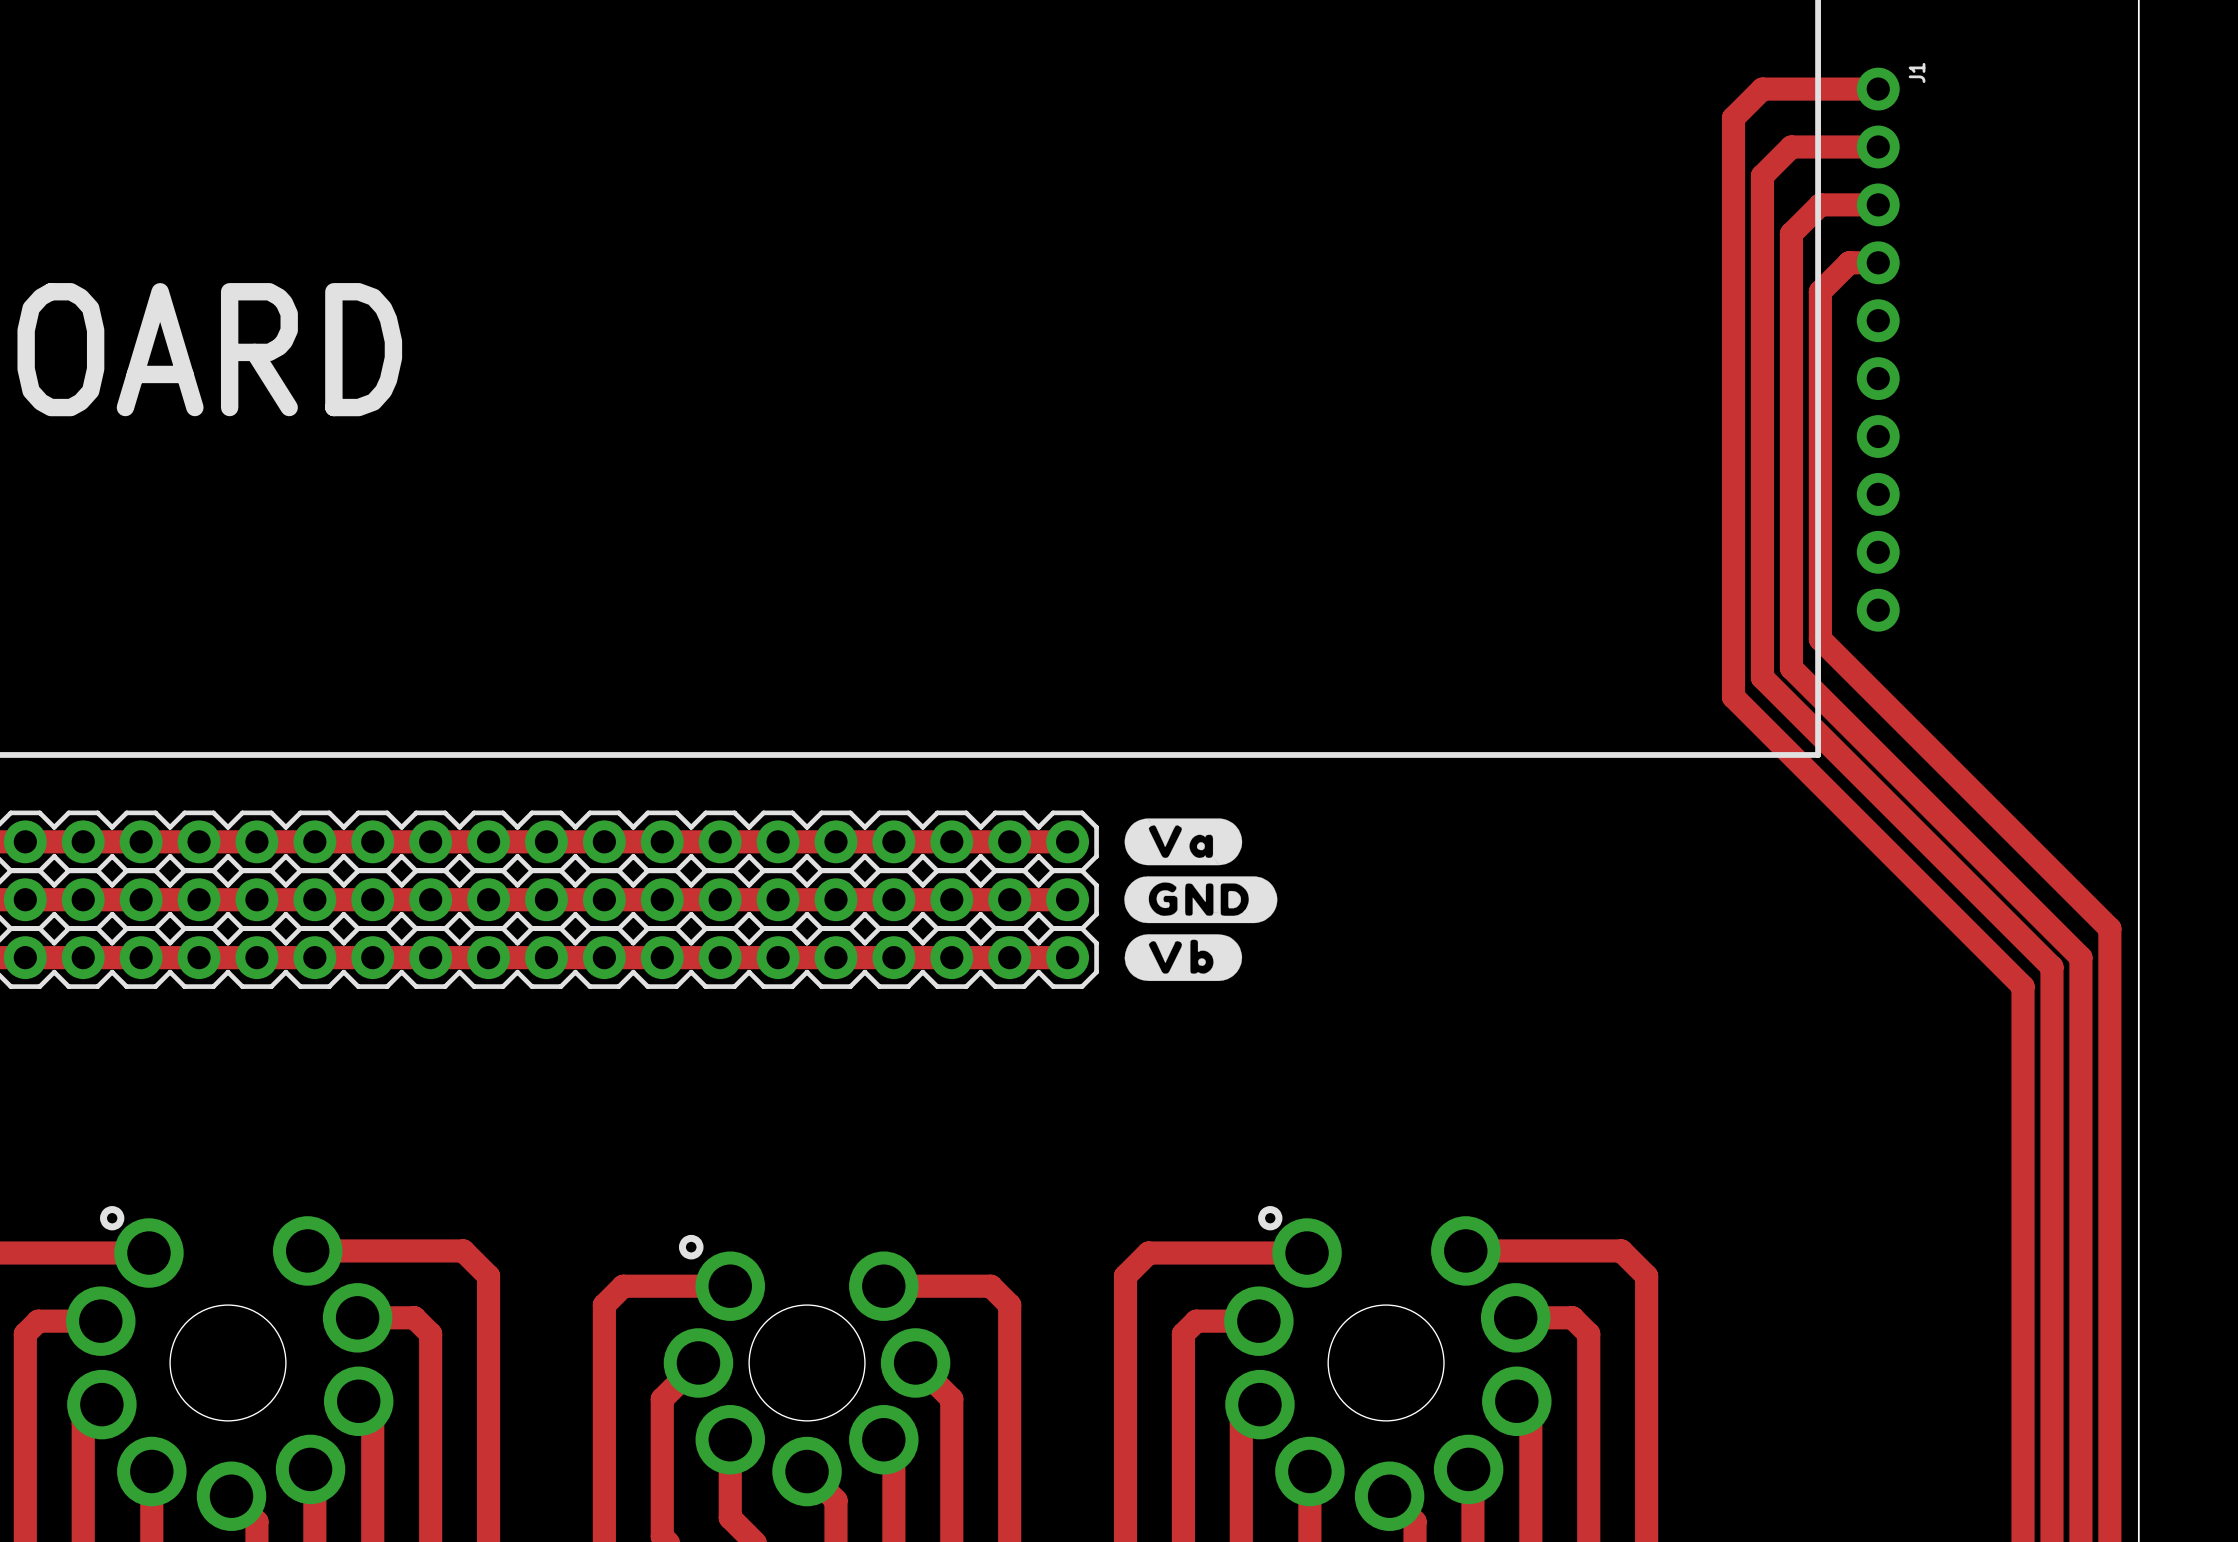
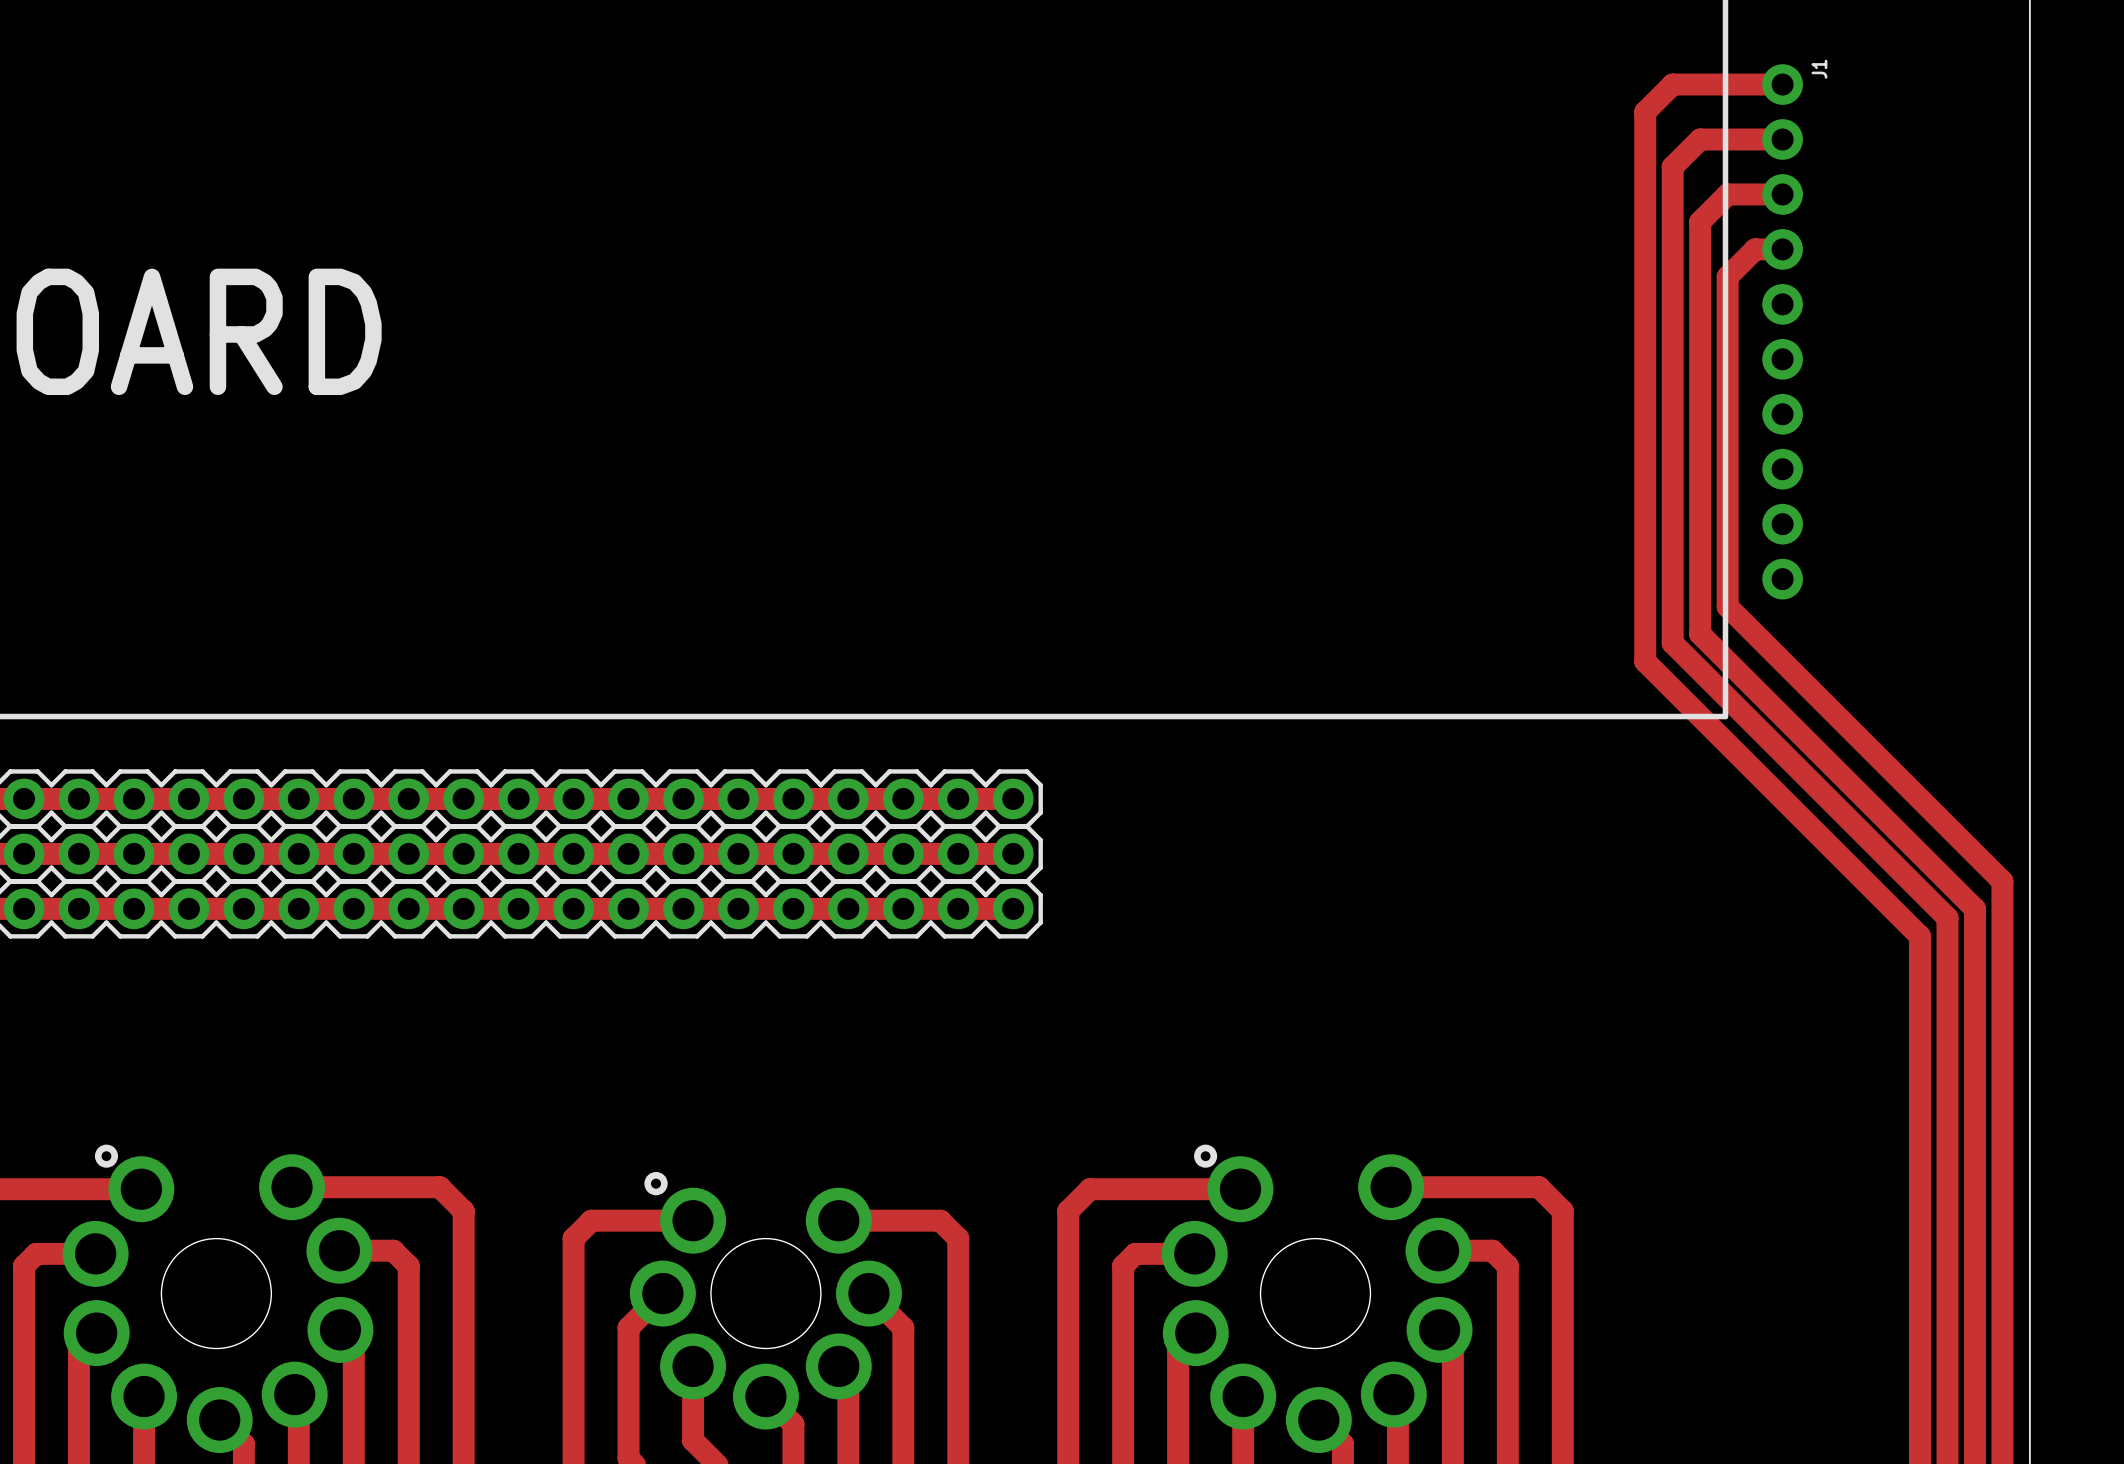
drawing: [1124, 818, 1278, 982] -> none

